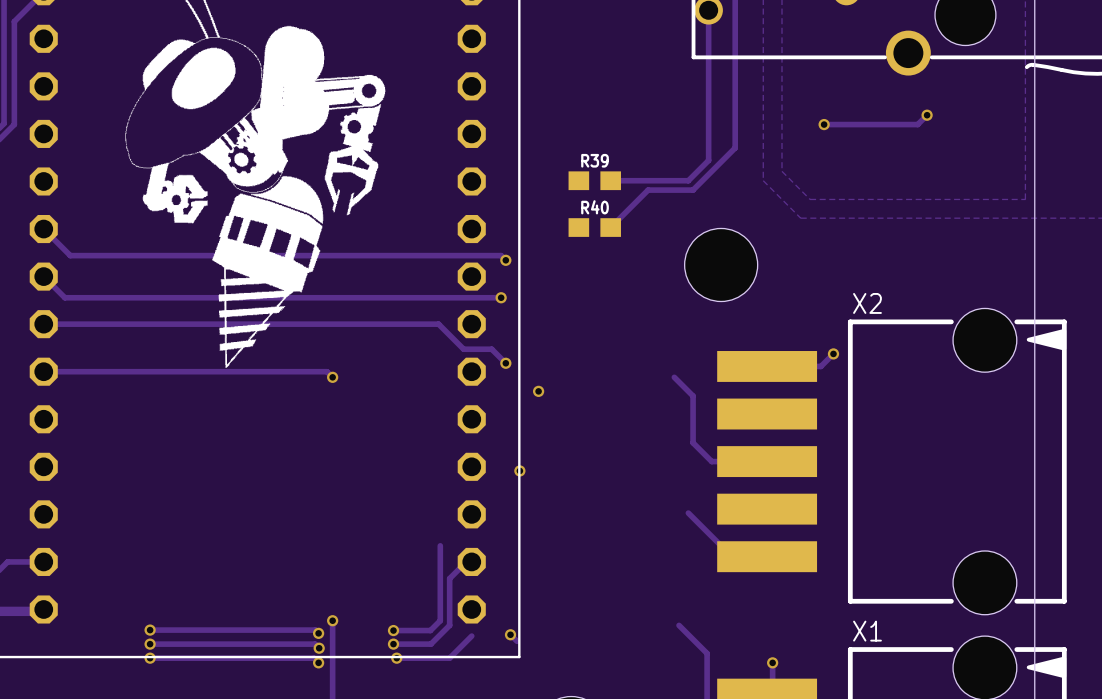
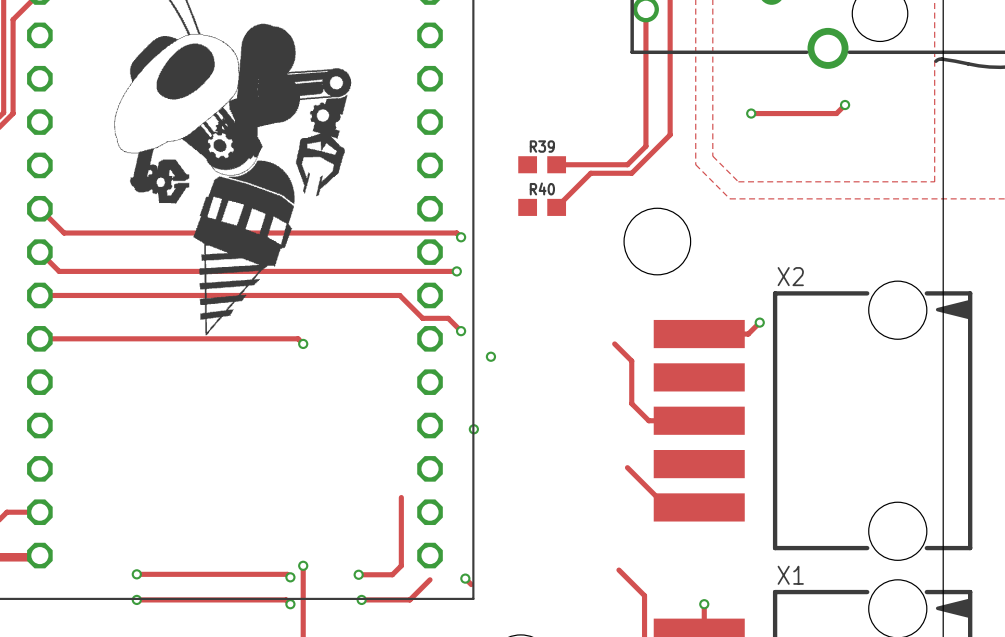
track: (466, 561) (449, 578) (449, 625) (430, 644) (393, 644) -> none
track: (150, 644) (315, 644) (319, 648) -> none
via: (150, 644) -> none
via: (393, 644) -> none
via: (319, 648) -> none

